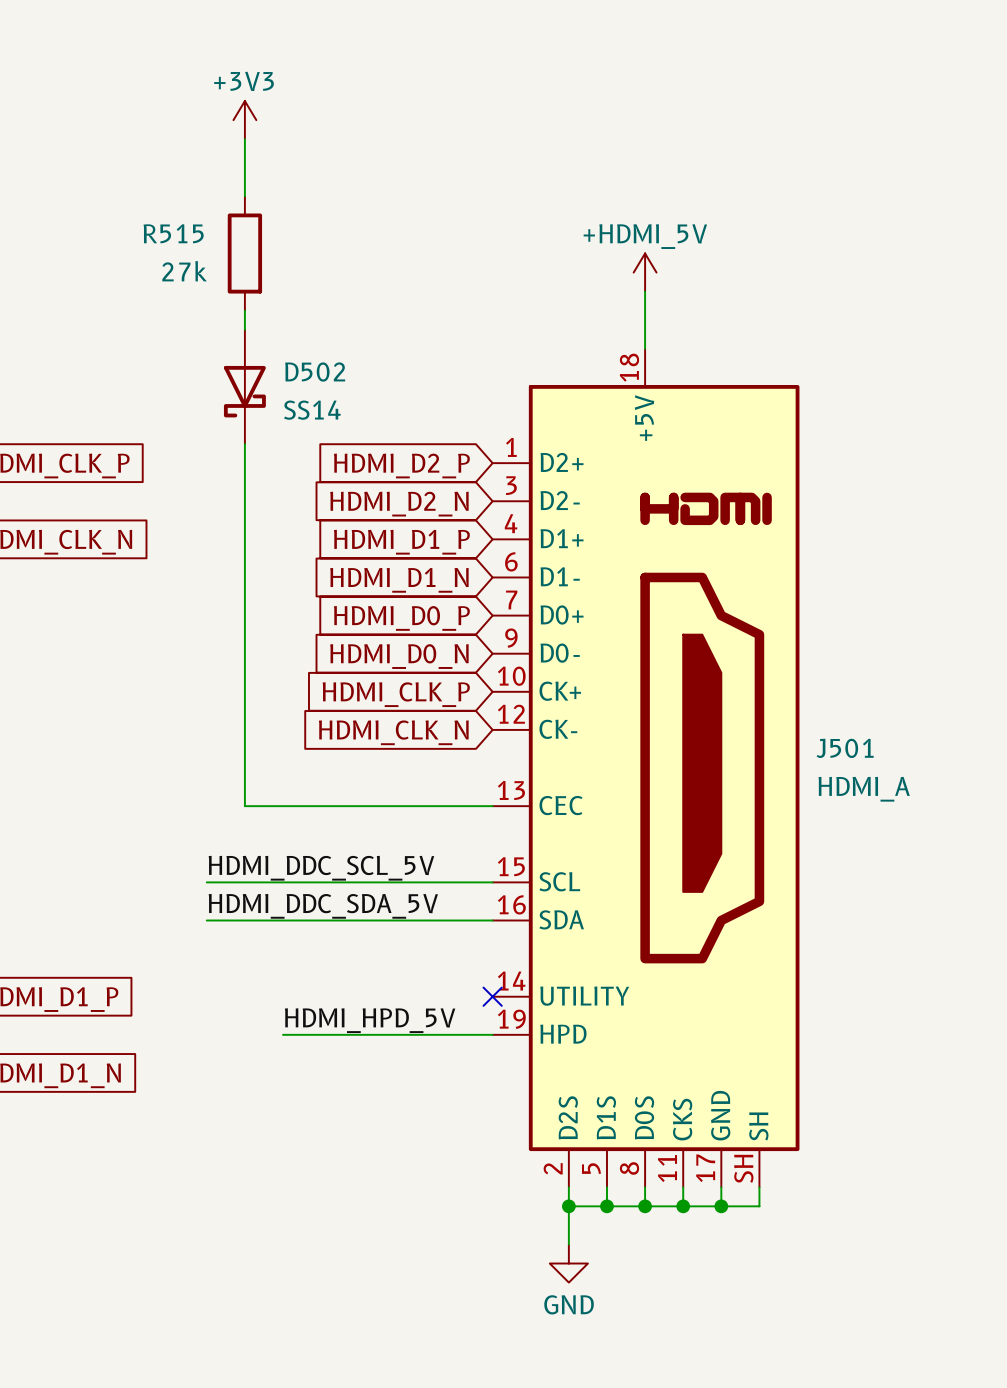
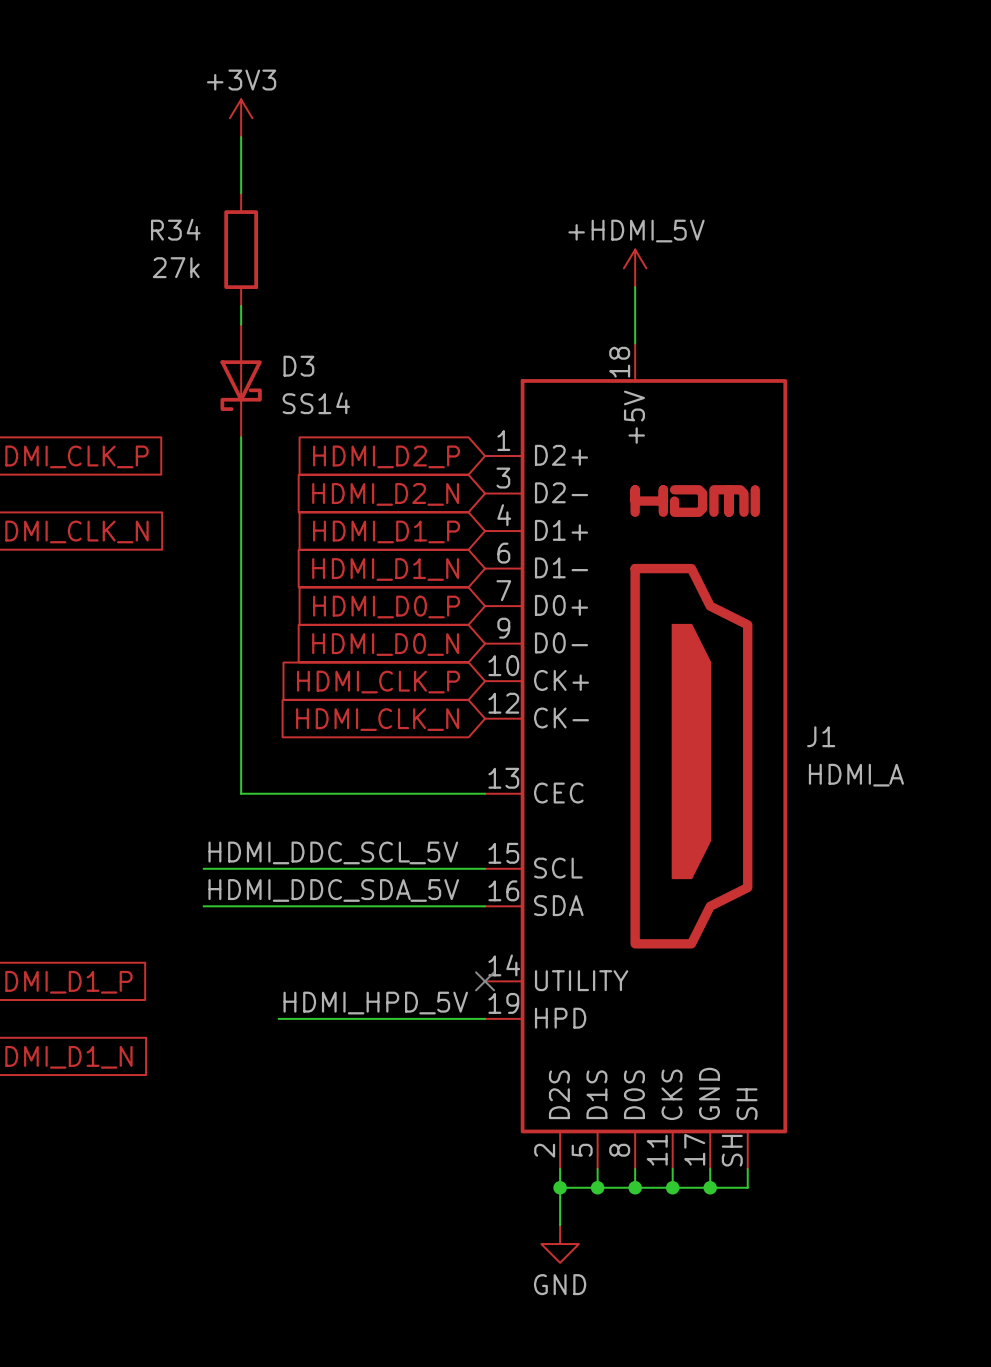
R515 name: R515 (173, 233) -> R34 (175, 229)
D502 name: D502 (315, 372) -> D3 (298, 366)
J501 name: J501 (845, 748) -> J1 (821, 736)

